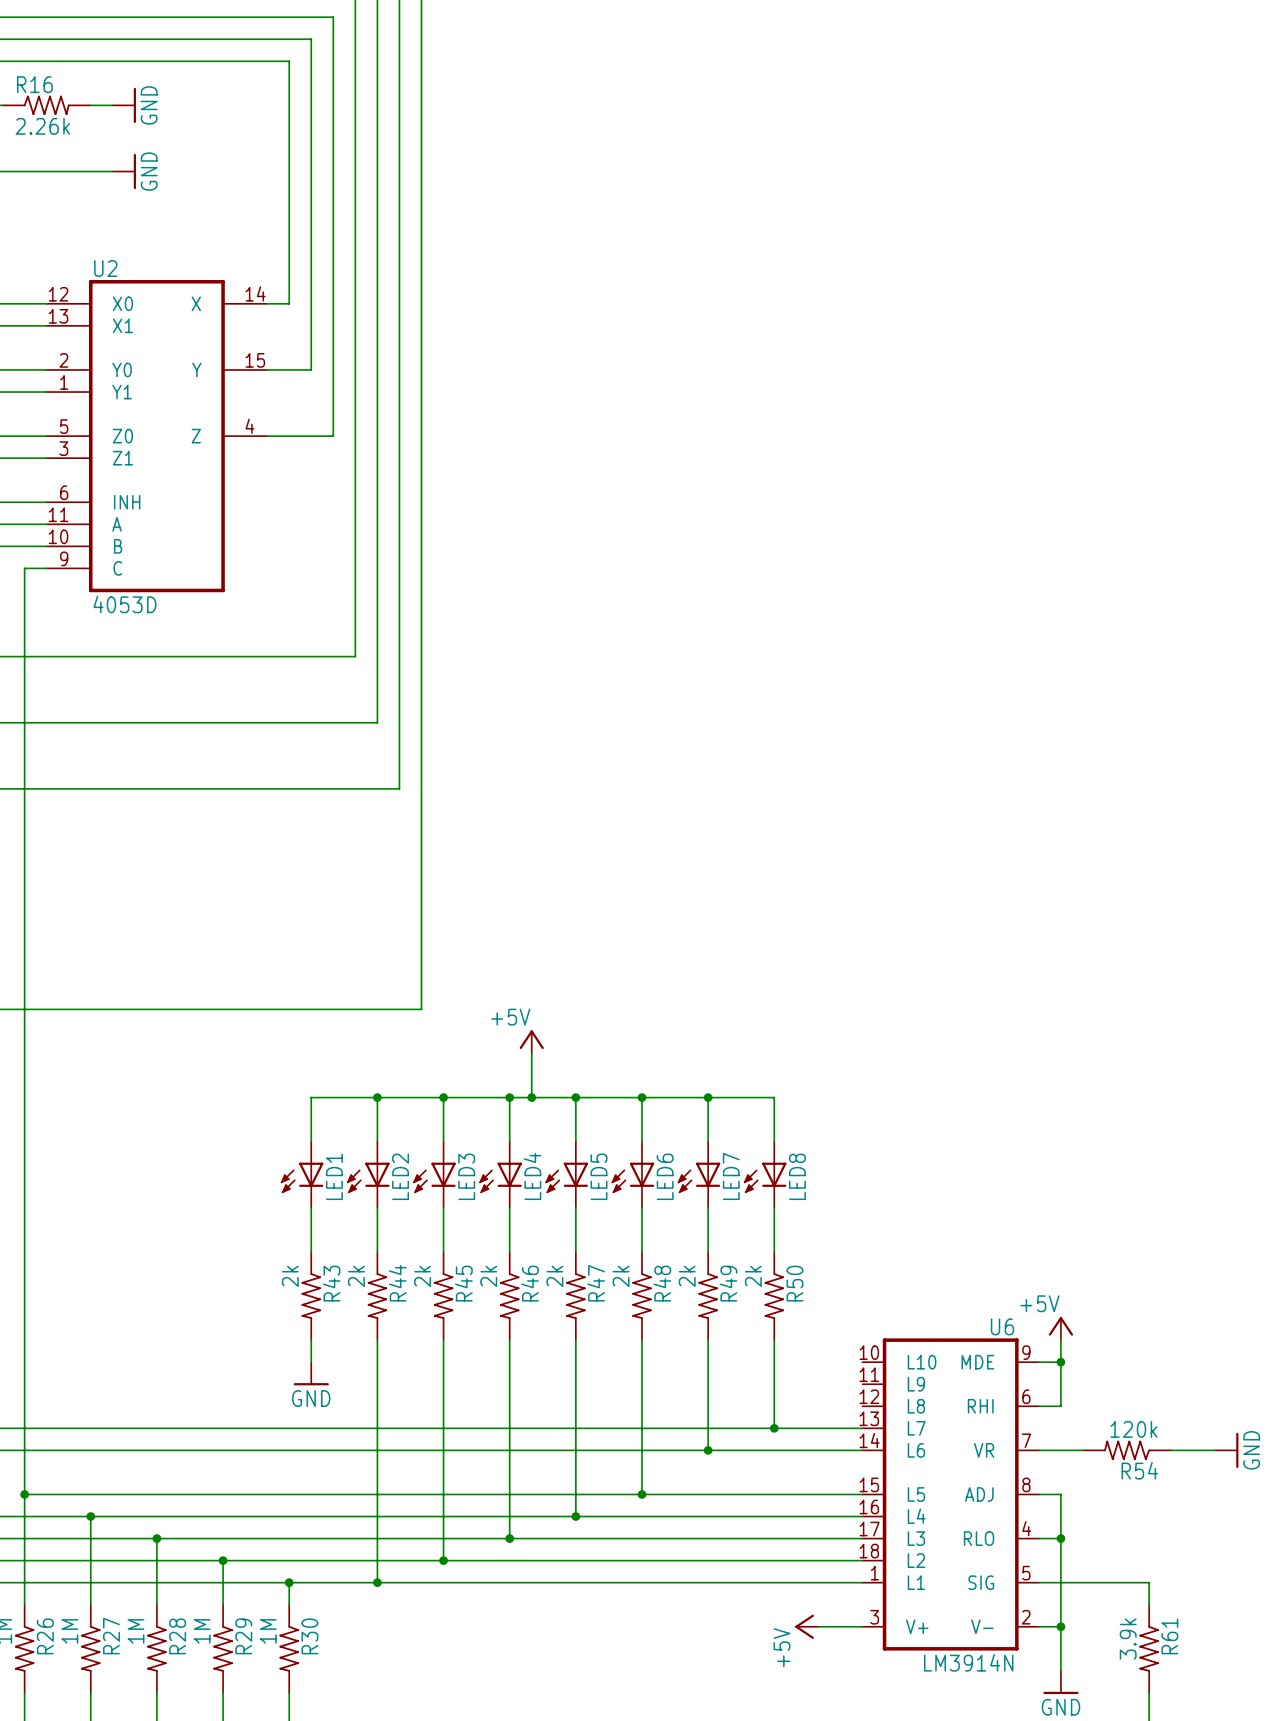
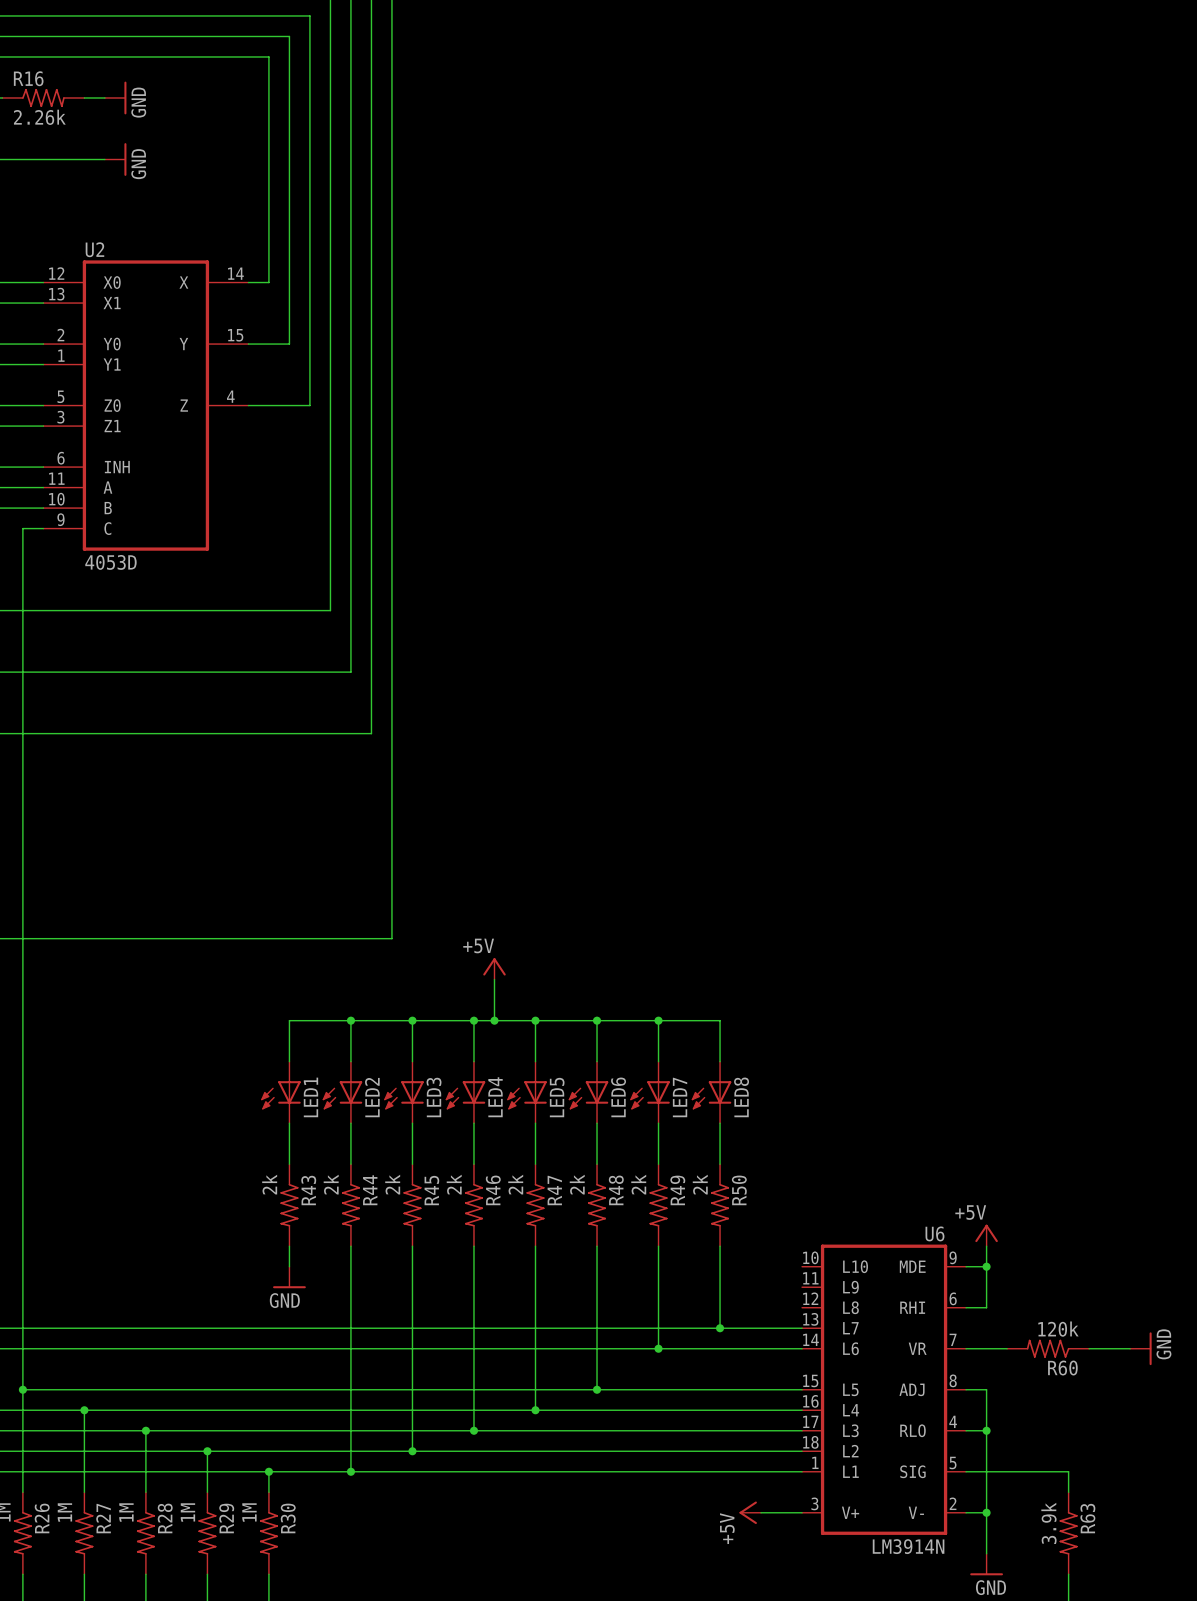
R54 name: R54 (1139, 1470) -> R60 (1062, 1368)
R61 name: R61 (1169, 1636) -> R63 (1087, 1518)

